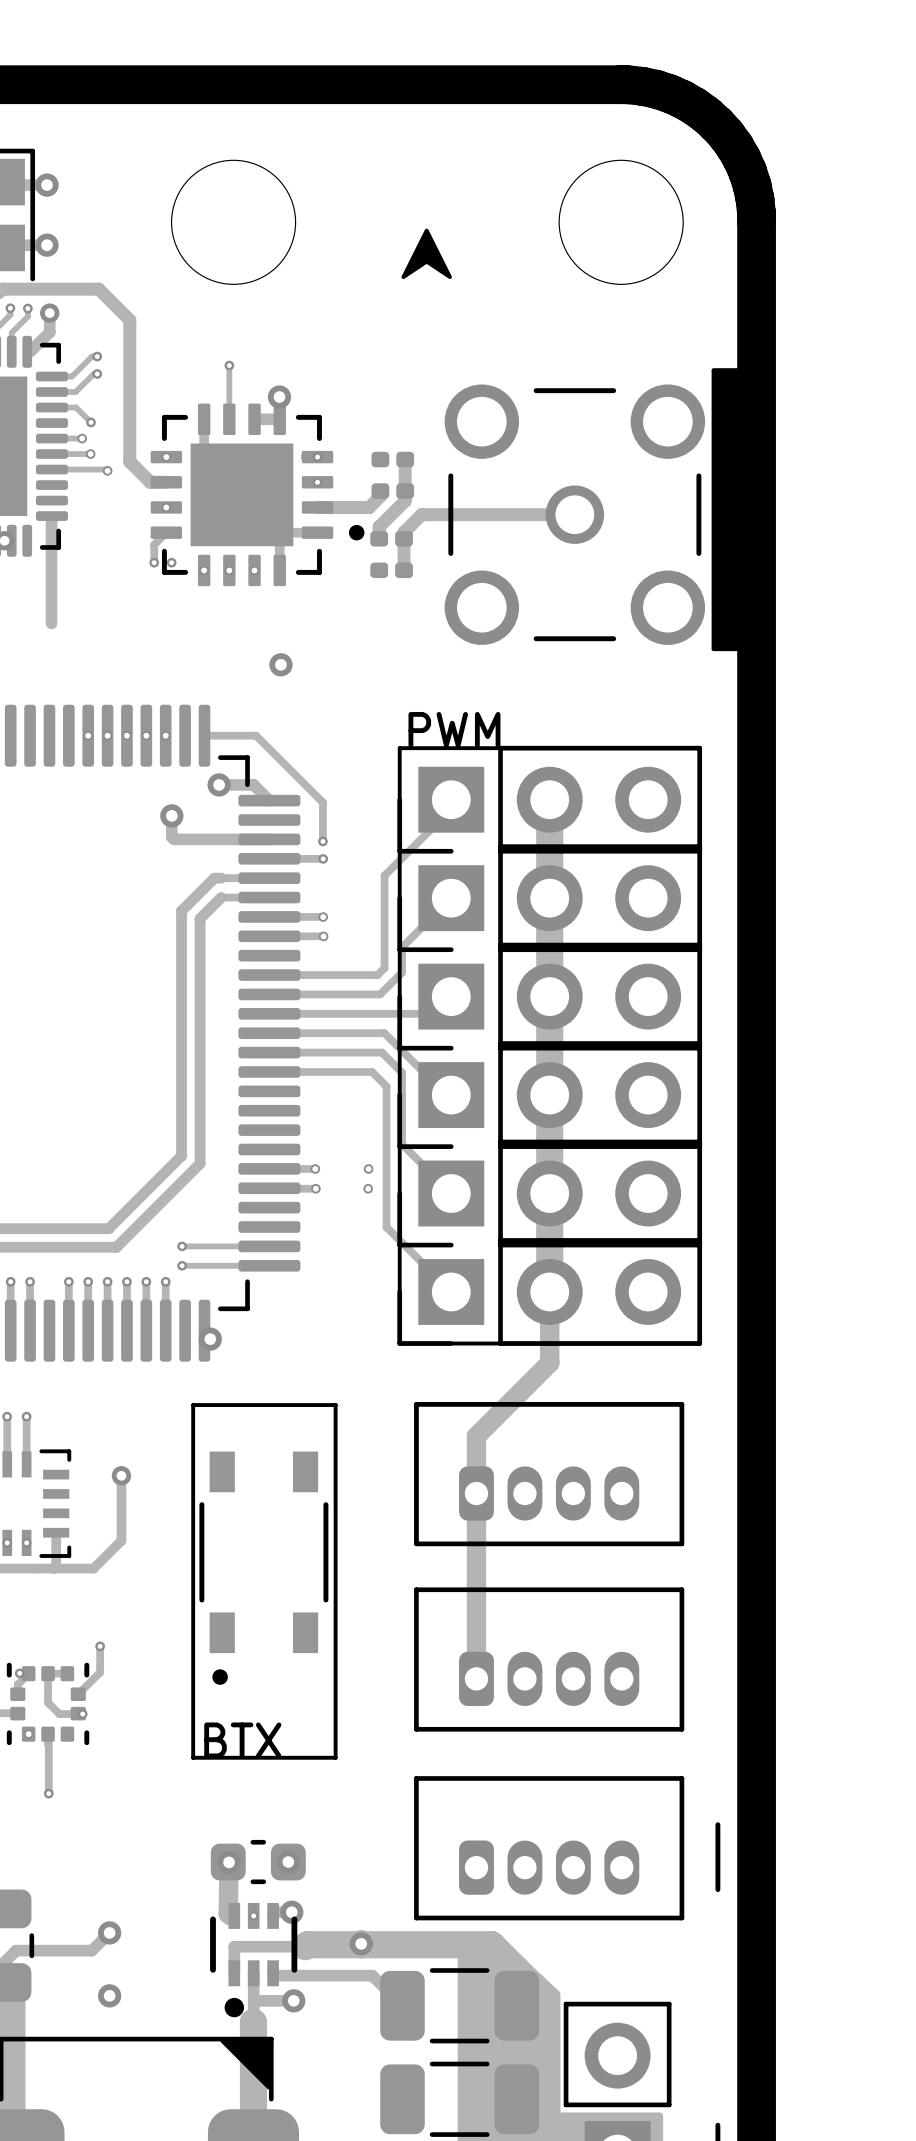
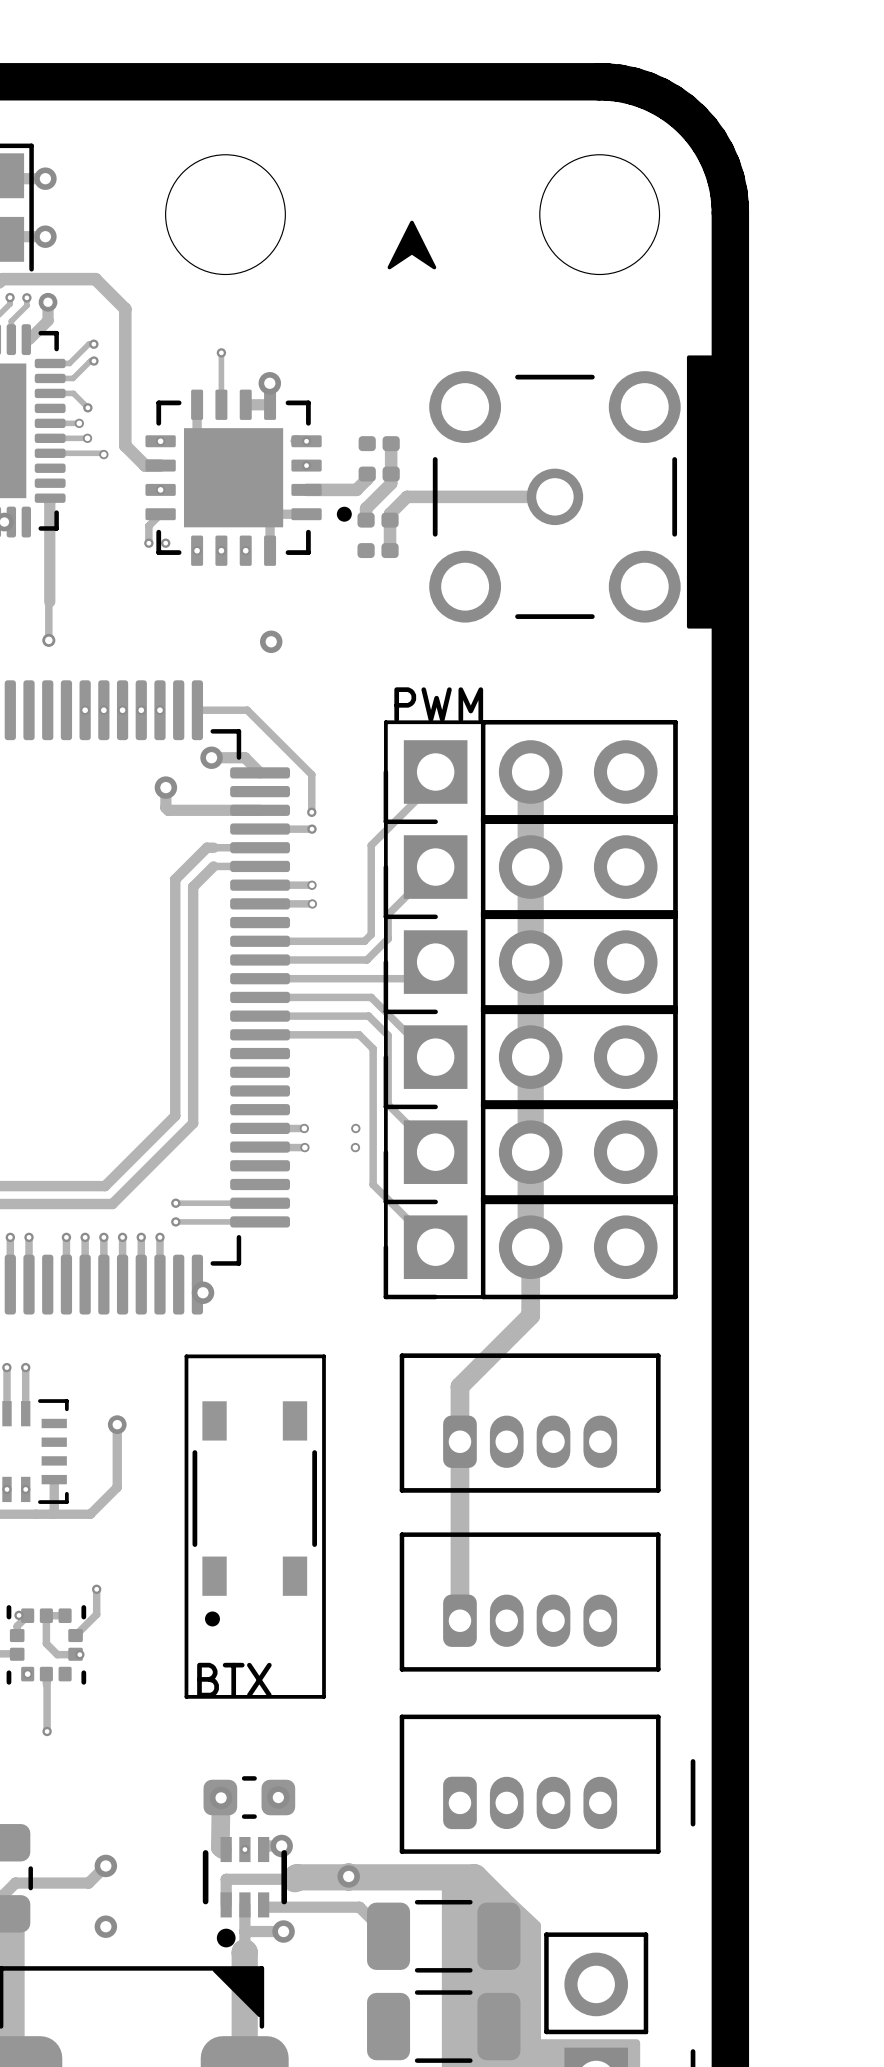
track: none -> (49, 601) (48, 640)
via: none -> (48, 640)

